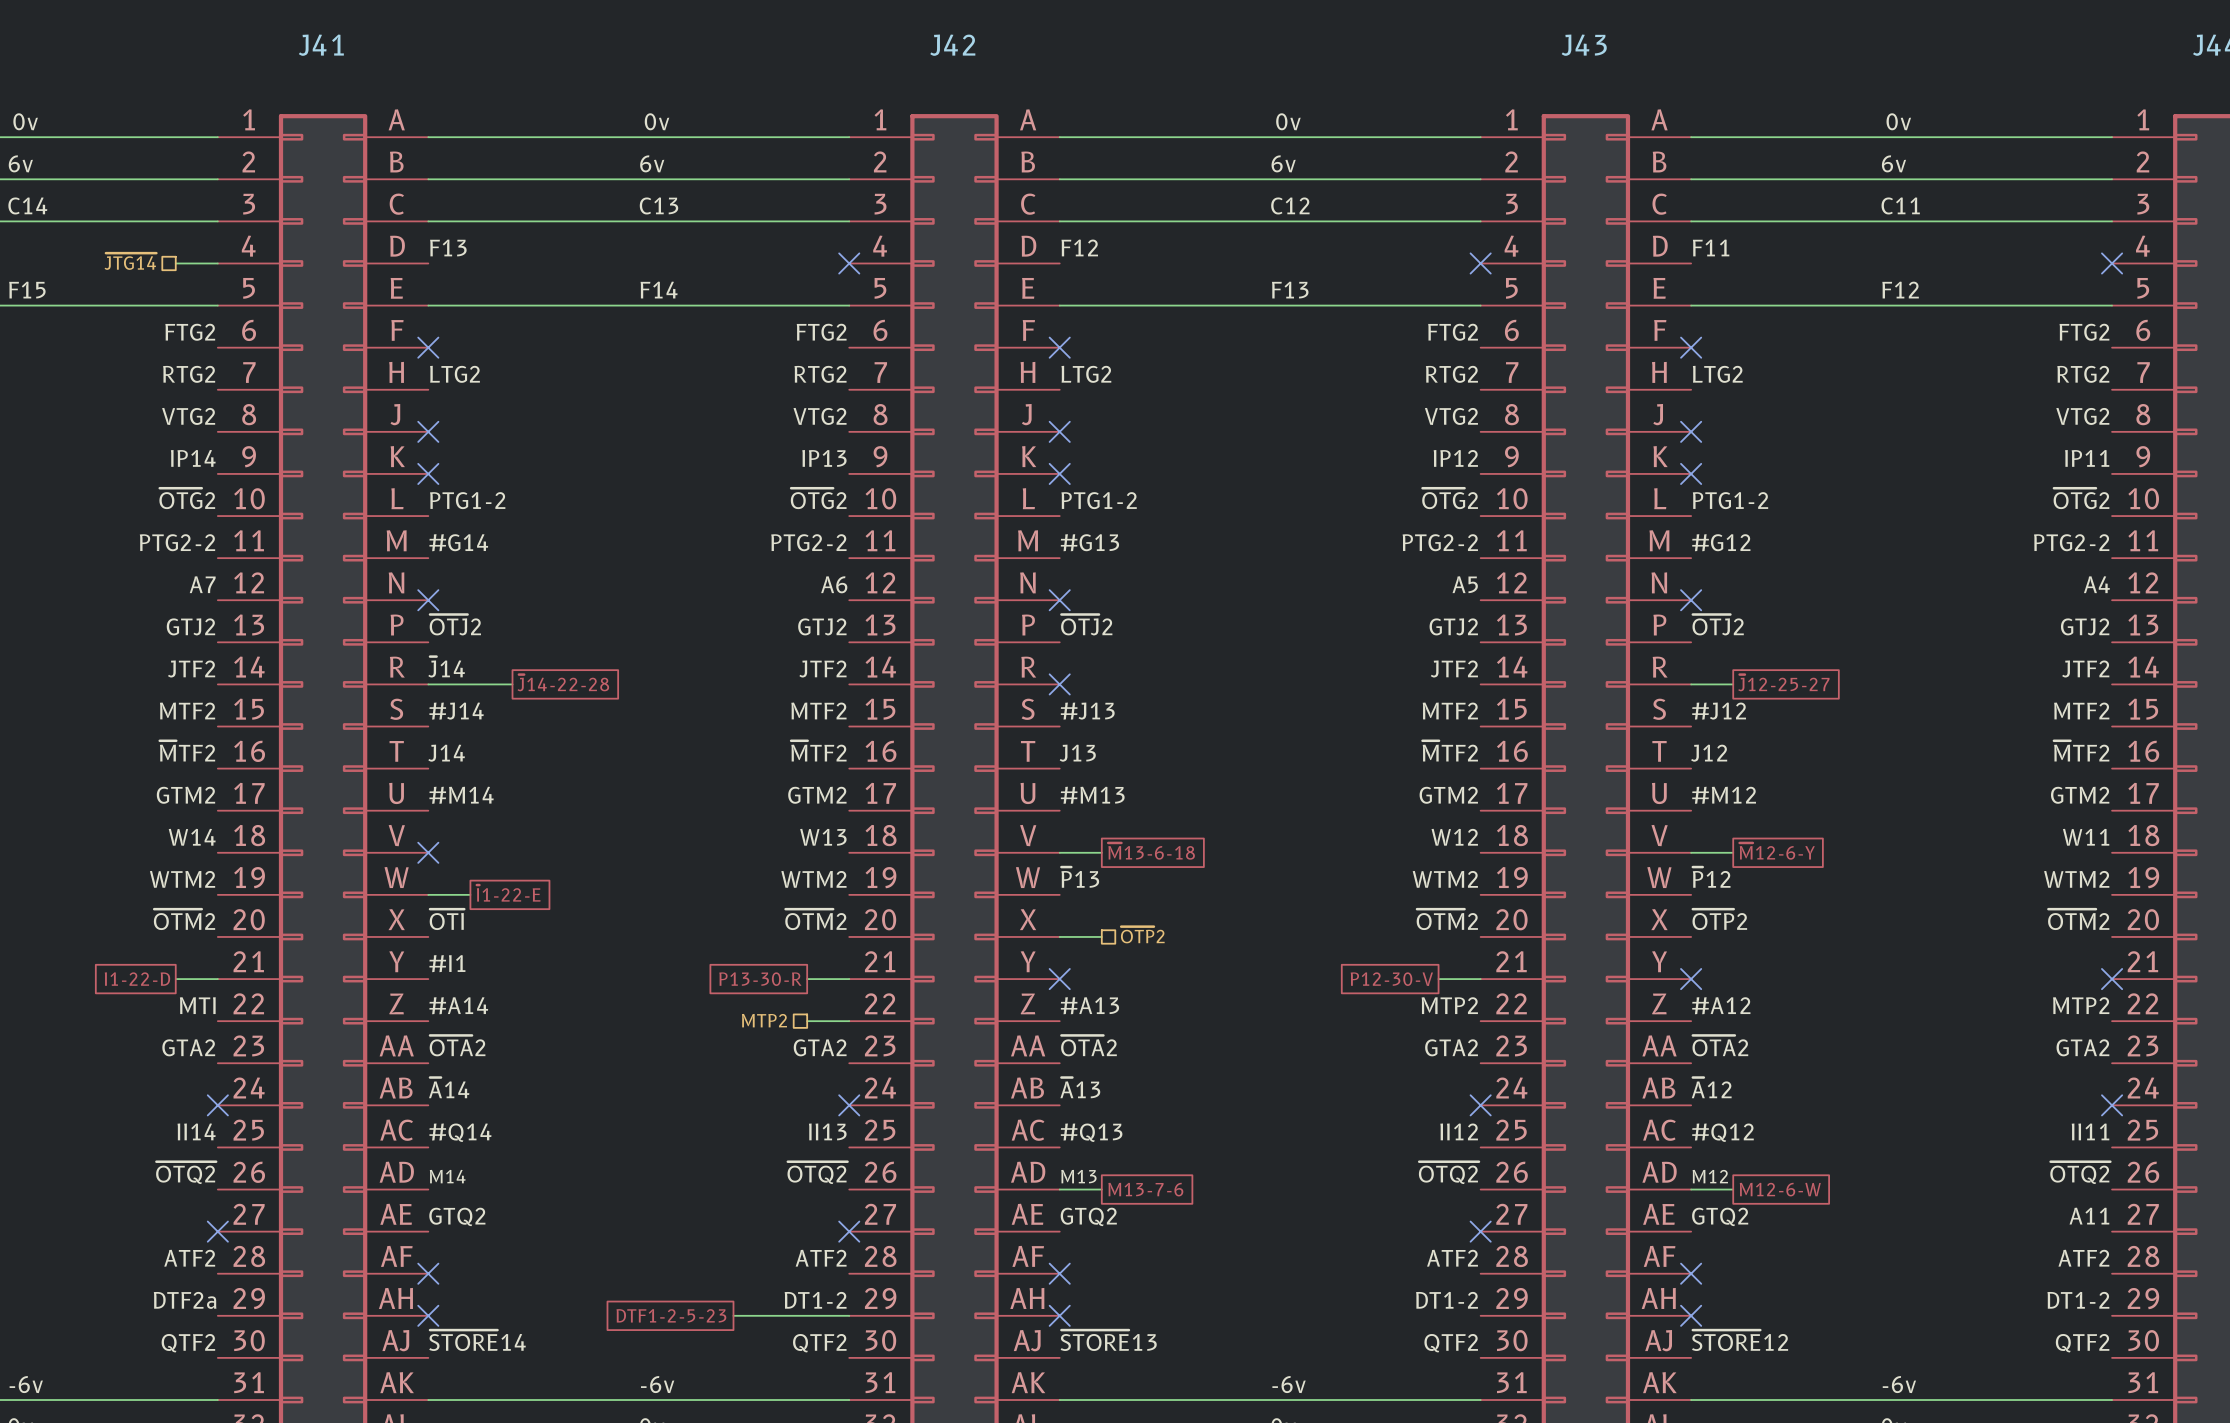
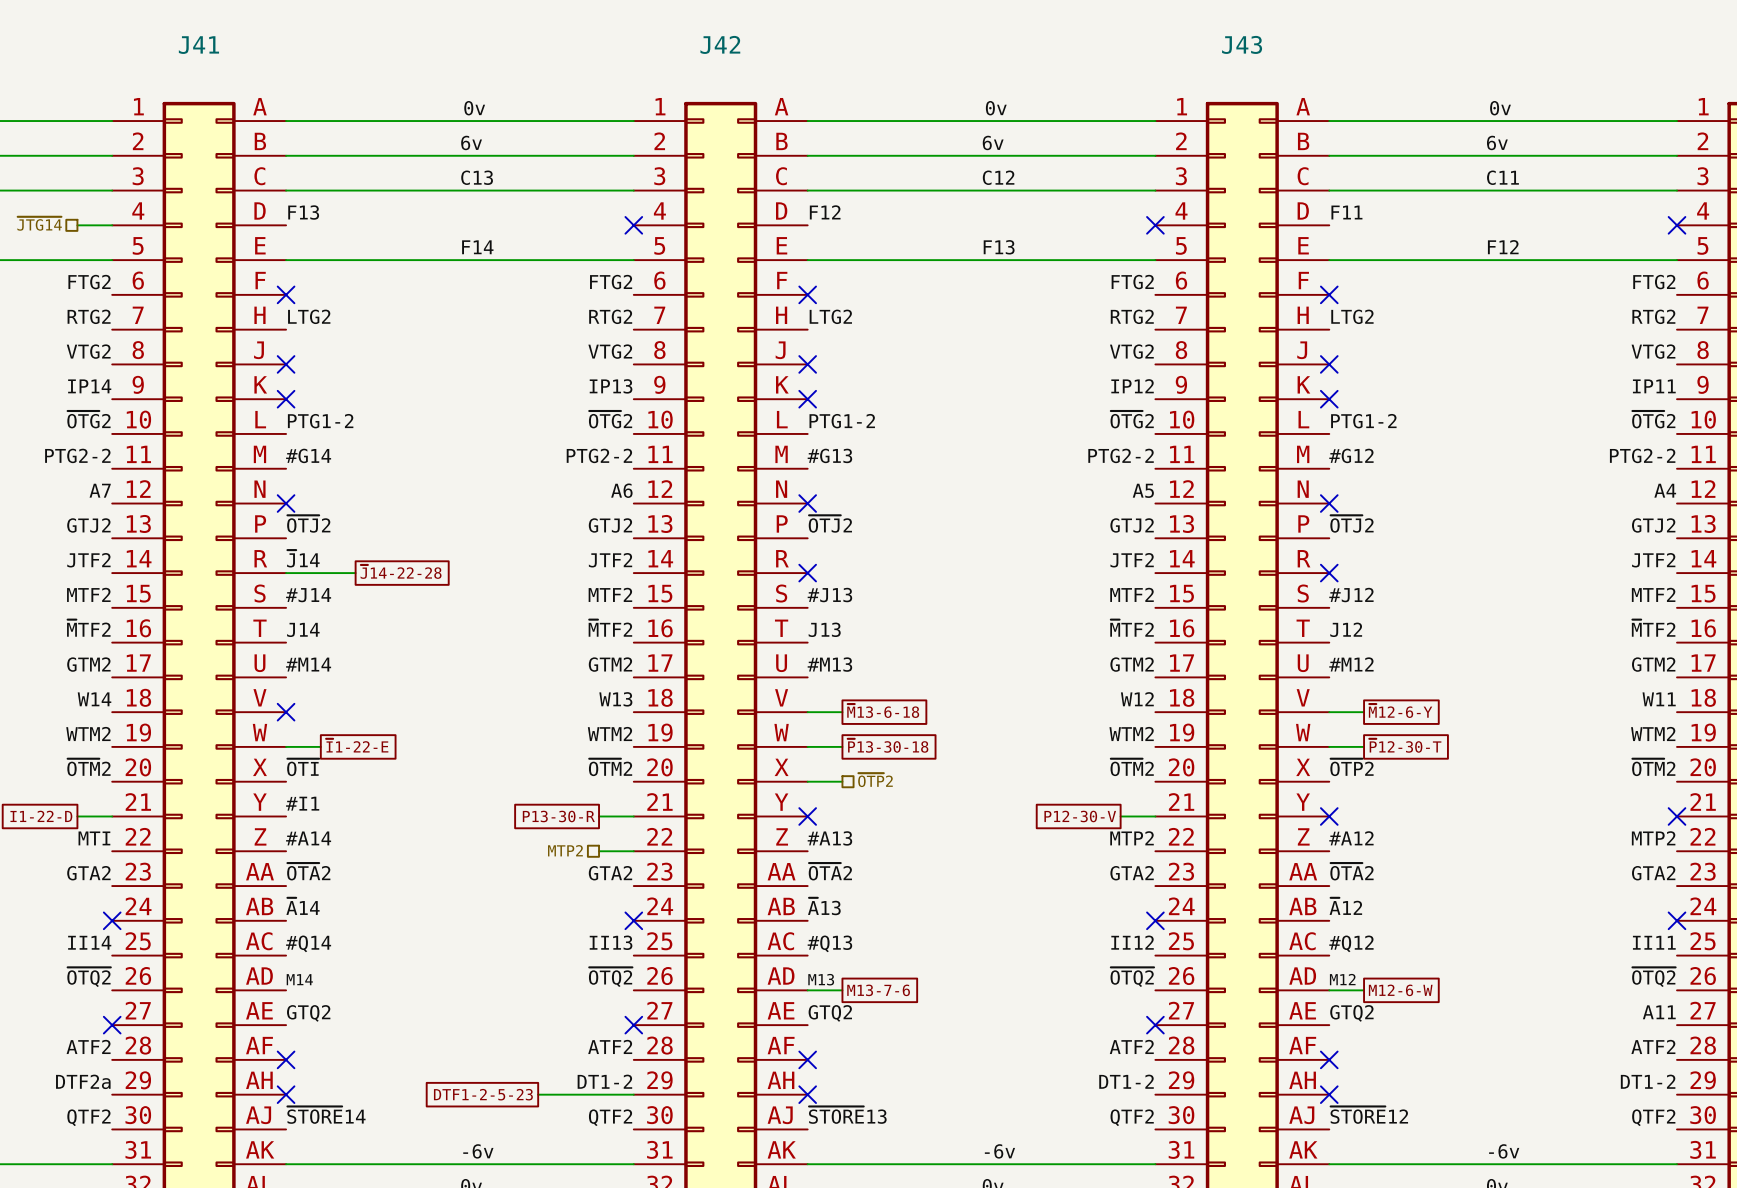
global label: ~{J}12-25-27 (1783, 682) -> none
wire: (1691, 684) (1733, 684) -> (1329, 746) (1364, 746)
no-connect mark: none -> (1329, 573)
label: ~{P}13 (1080, 877) -> none
label: ~{P}12 (1711, 877) -> none
global label: none -> ~{P}13-30-18 (888, 745)
global label: none -> ~{P}12-30-T (1405, 745)
wire: none -> (807, 746) (842, 746)

